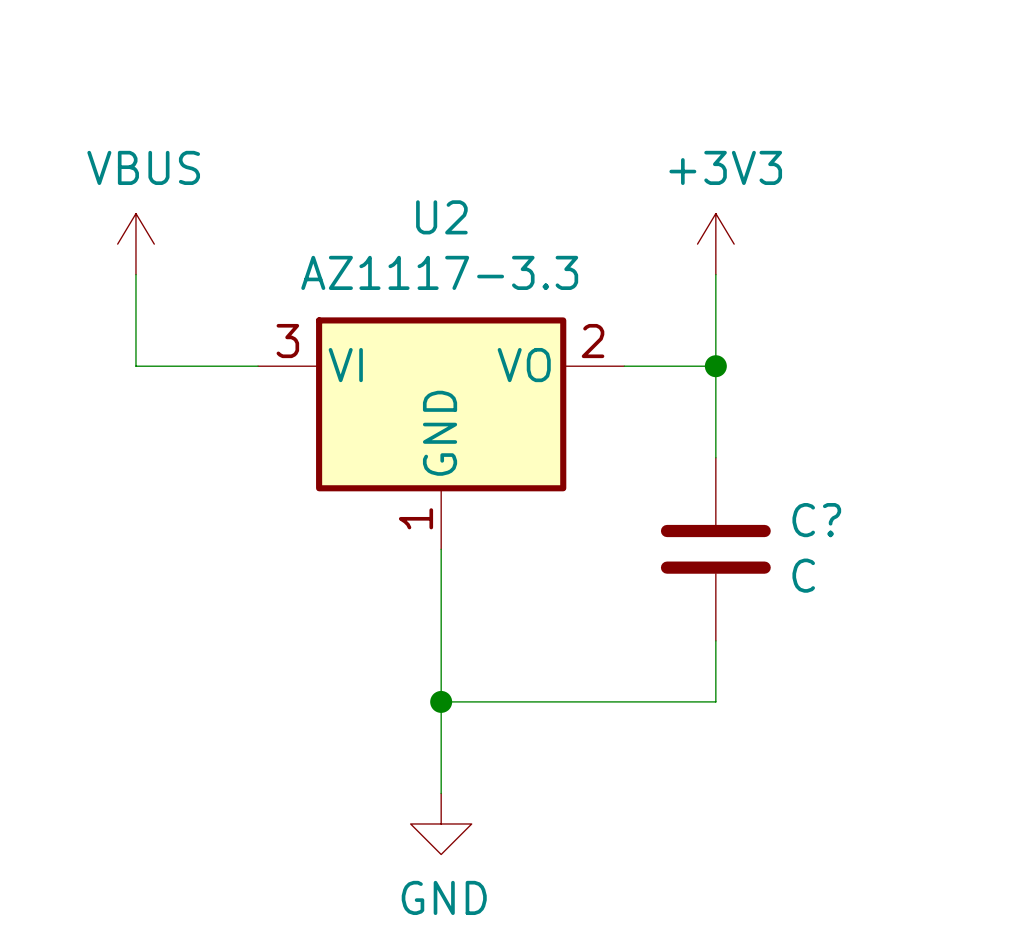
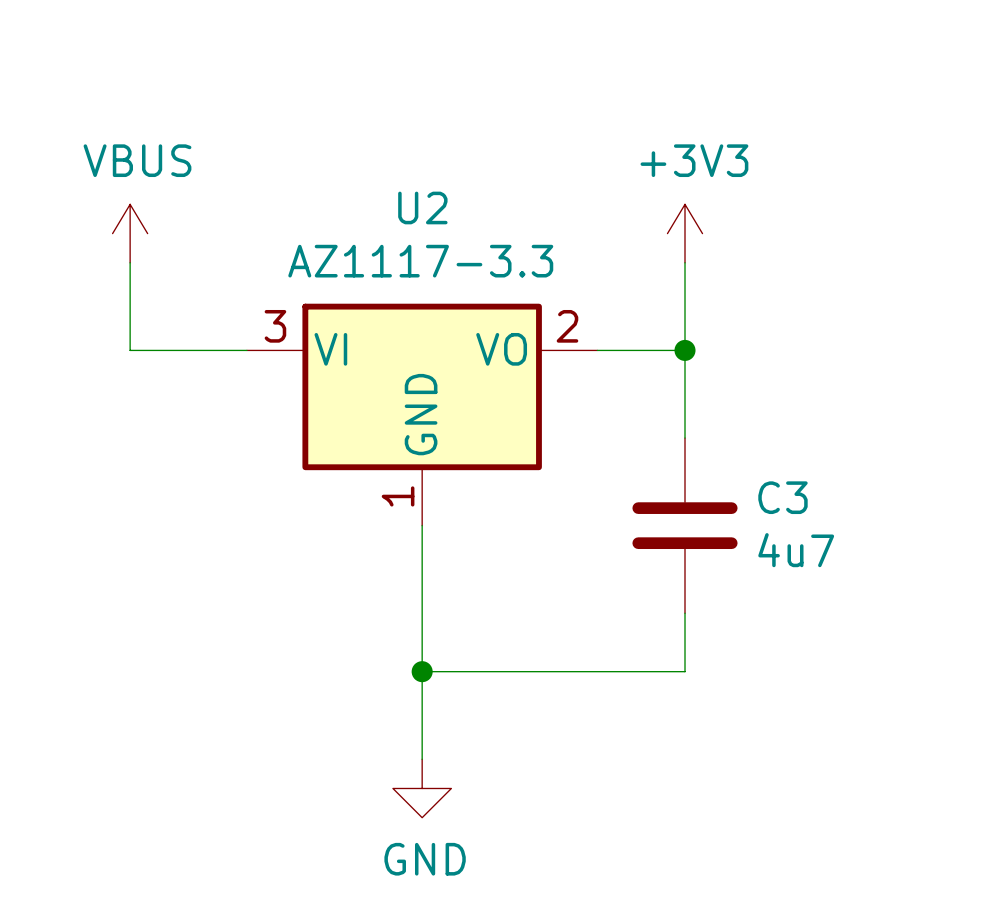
C? name: C? (816, 520) -> C3 (782, 497)
C? value: C (803, 575) -> 4u7 (796, 550)

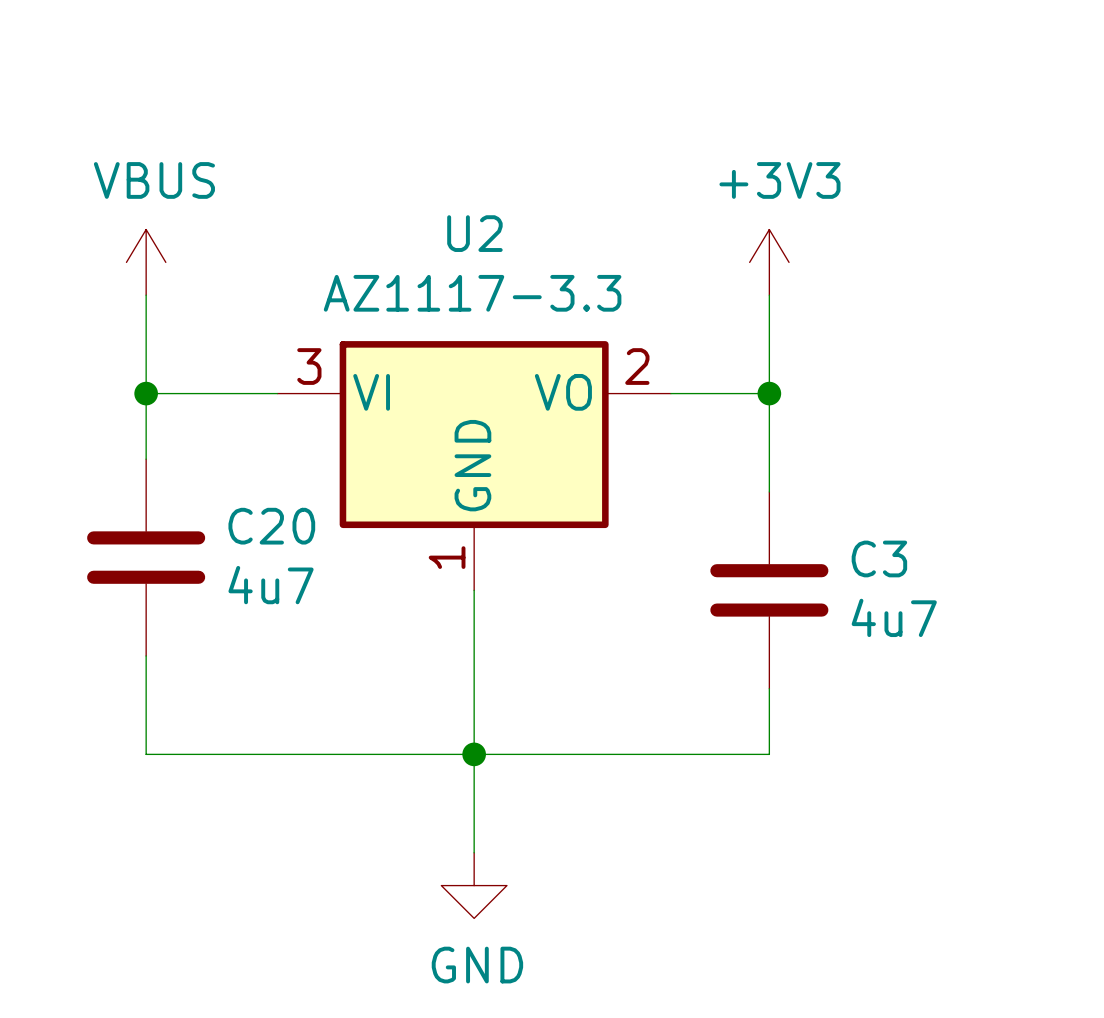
wire: none -> (146, 393) (146, 459)
junction: none -> (146, 393)
C20: none -> 4u7 (146, 557)
wire: none -> (146, 655) (146, 754) (474, 754)

